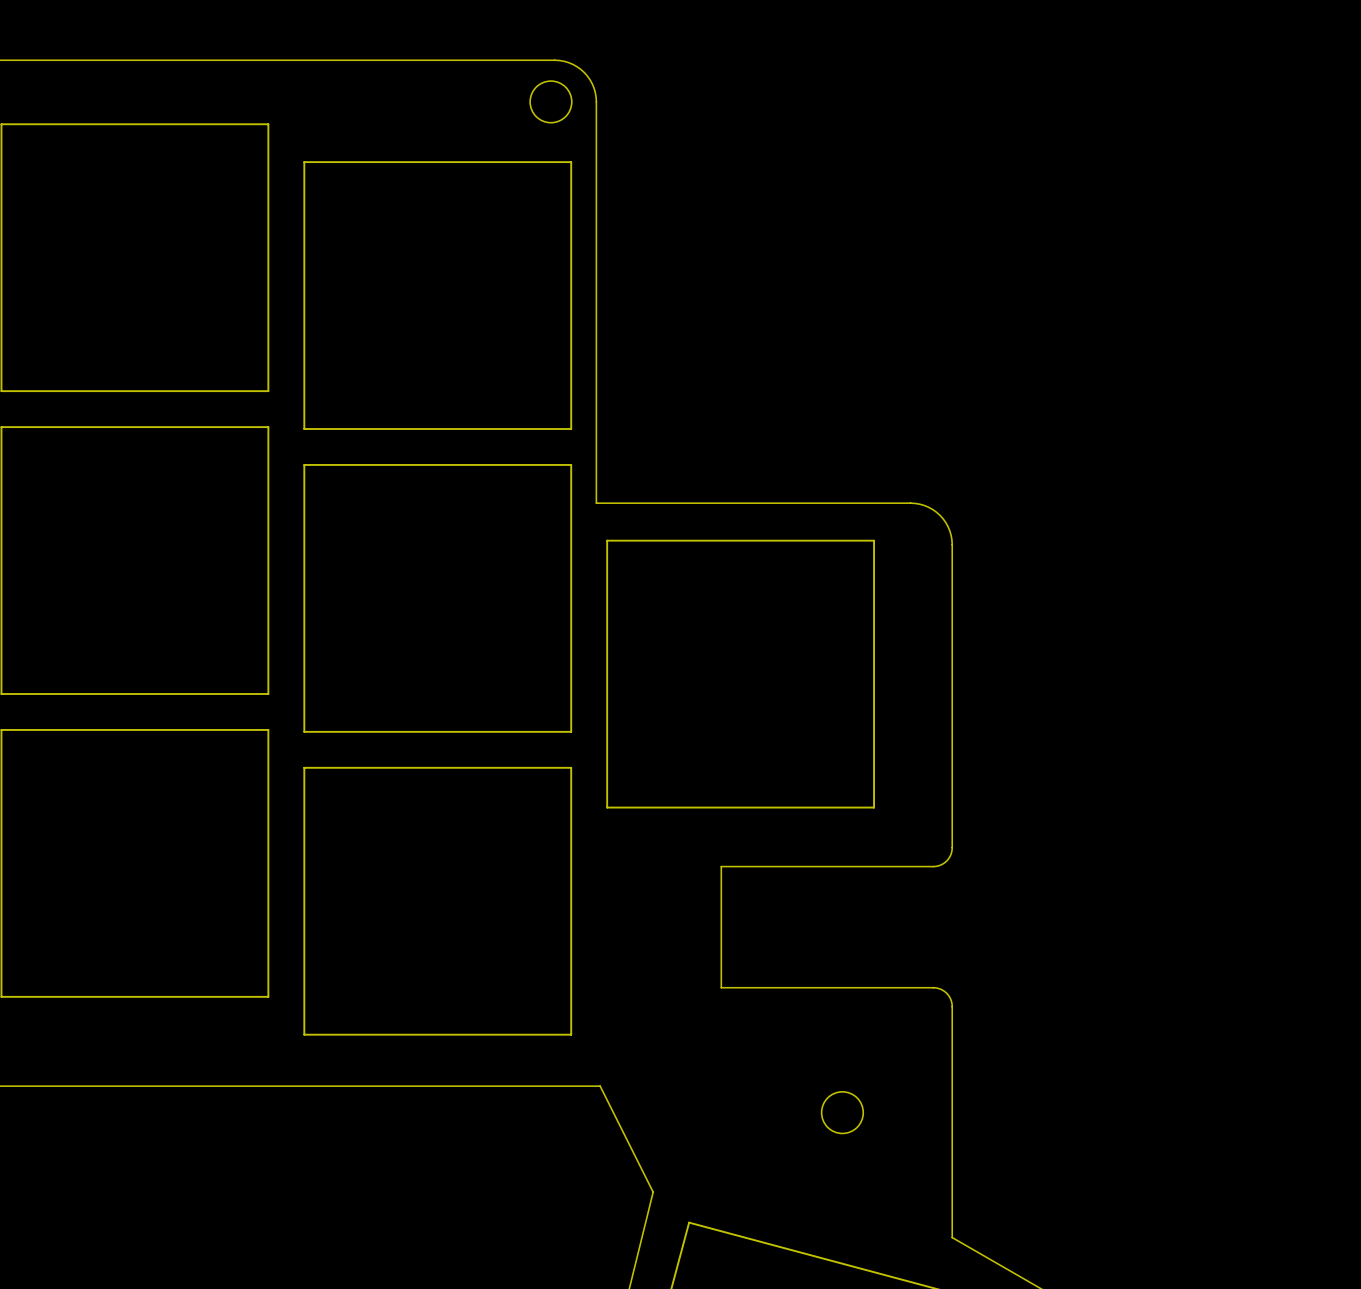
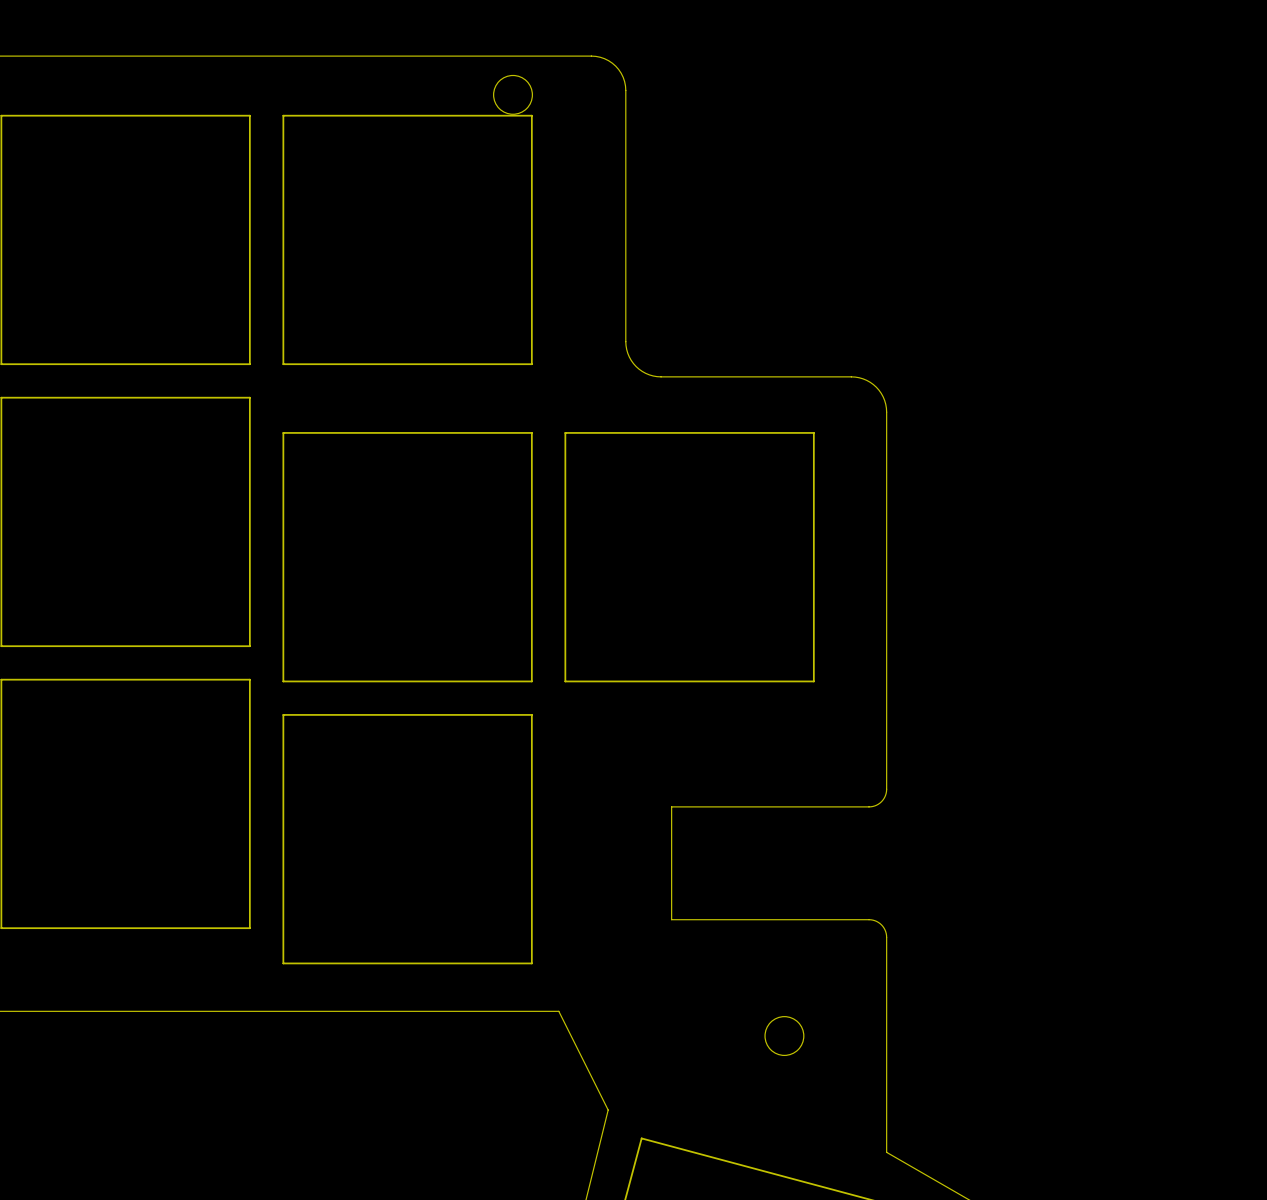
board edge: (554, 60) (572, 64) (584, 72) (592, 83) (596, 97) (596, 503) (915, 503) (928, 507) (940, 515) (948, 526) (952, 544) -> (516, 56) (600, 57) (615, 66) (623, 77) (625, 90) (625, 341) (627, 353) (633, 363) (645, 373) (657, 376) (851, 376) (870, 382) (881, 393) (886, 408) (886, 507)
drawing position: (437, 295) -> (407, 239)
drawing position: (740, 674) -> (689, 557)

